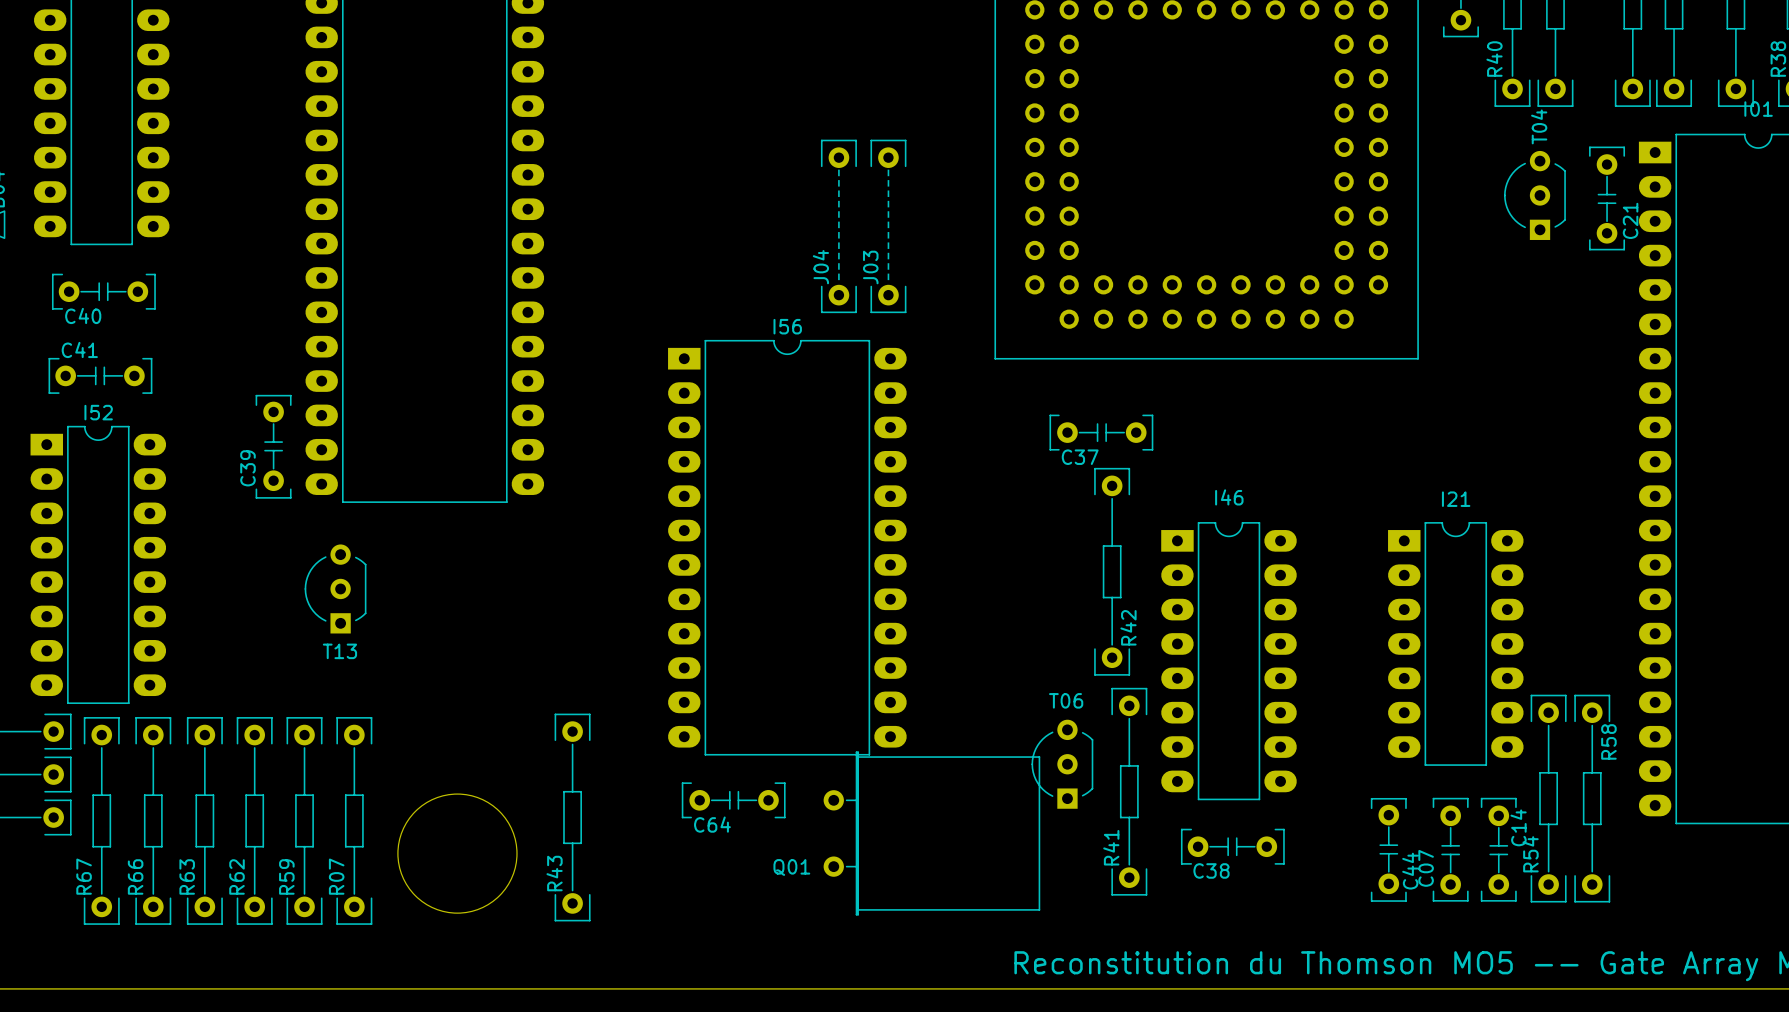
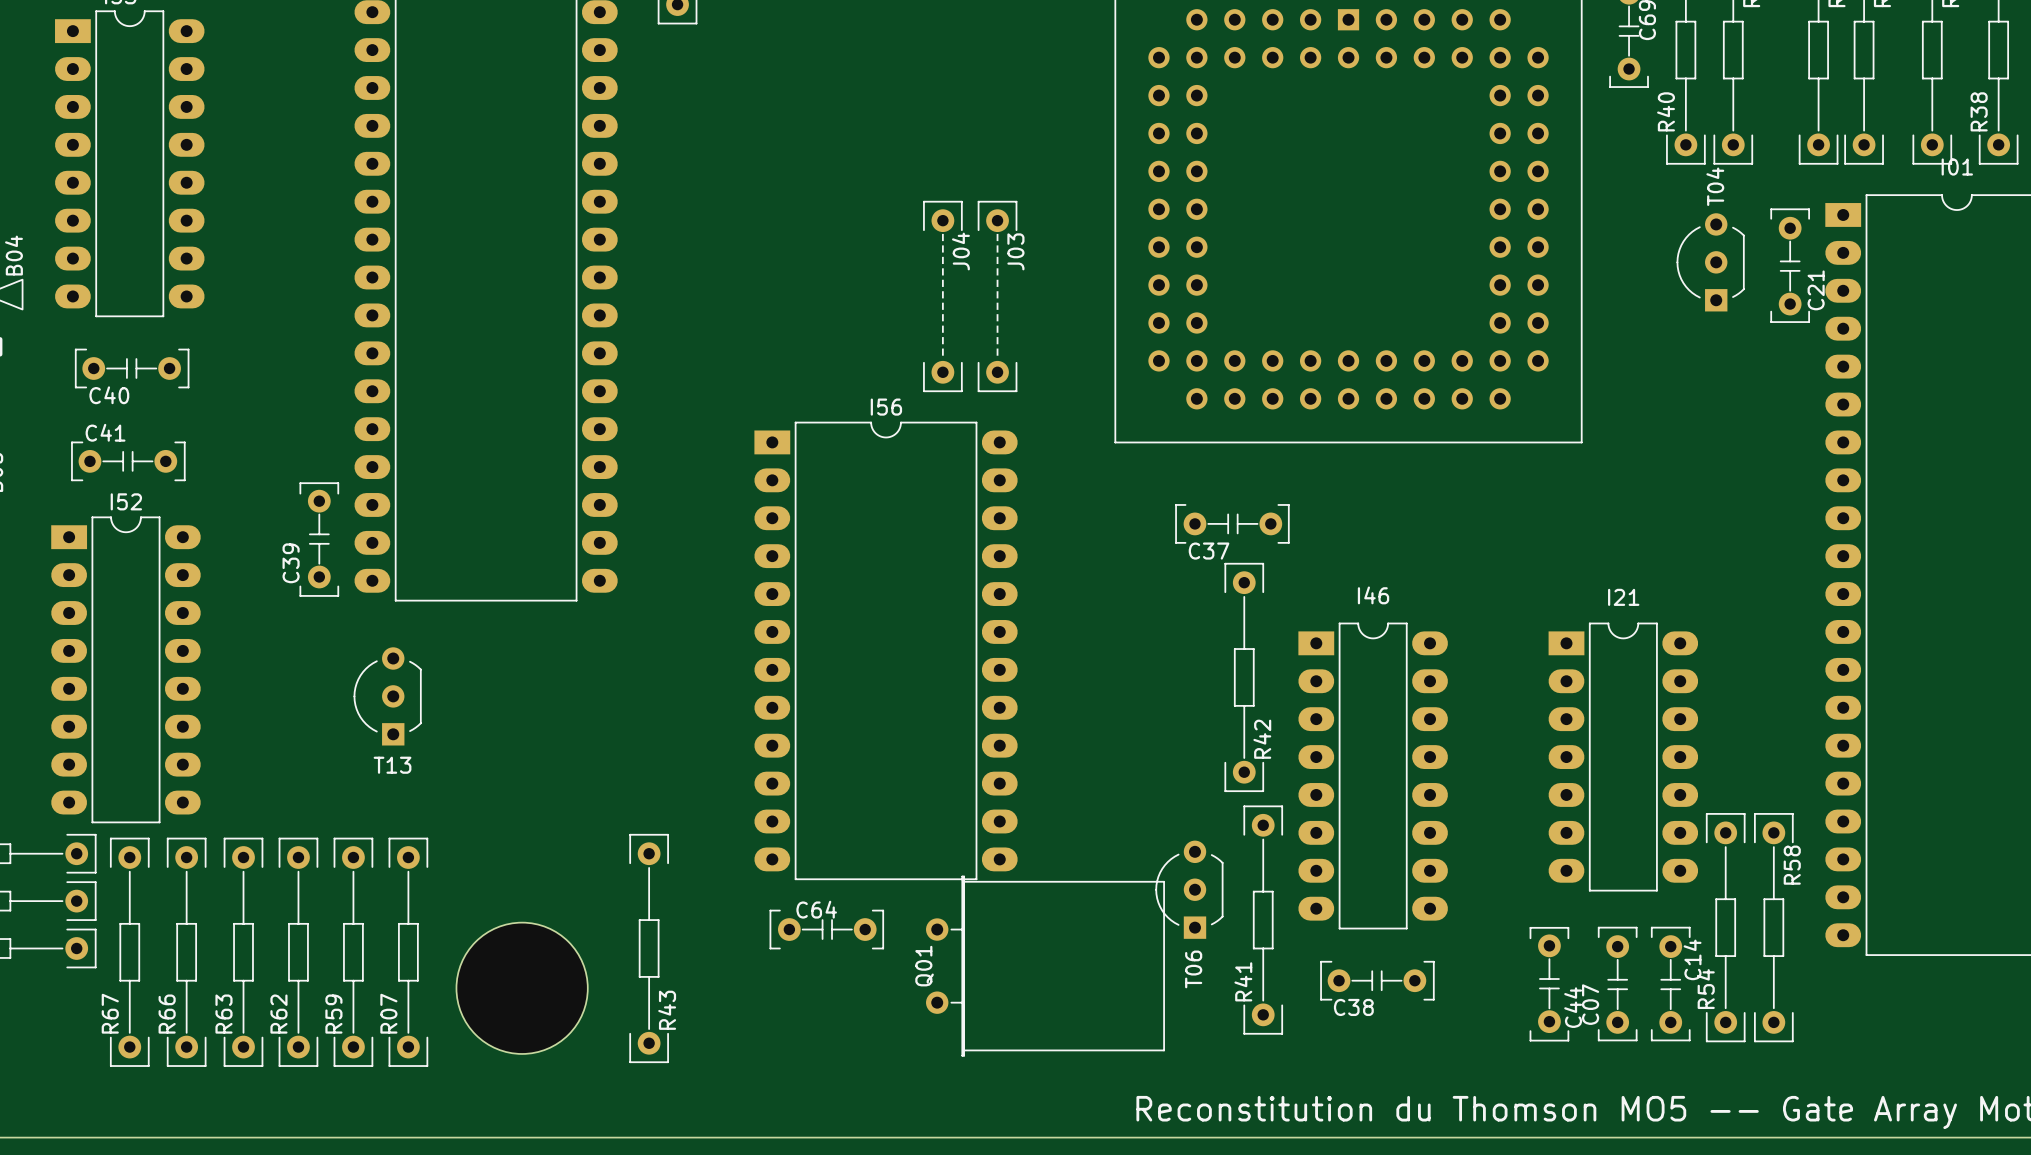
J04 name position: J04 (820, 267) -> J04 (960, 251)
J03 name position: J03 (870, 267) -> J03 (1015, 251)
T06 name rotation: 0° (1066, 700) -> 90° counterclockwise (1193, 969)
T06 name position: T06 (1066, 700) -> T06 (1193, 969)
C64 name position: C64 (712, 824) -> C64 (816, 909)
Q01 name rotation: 0° (791, 867) -> 90° counterclockwise (924, 966)
R43 name position: R43 (554, 873) -> R43 (667, 1010)

